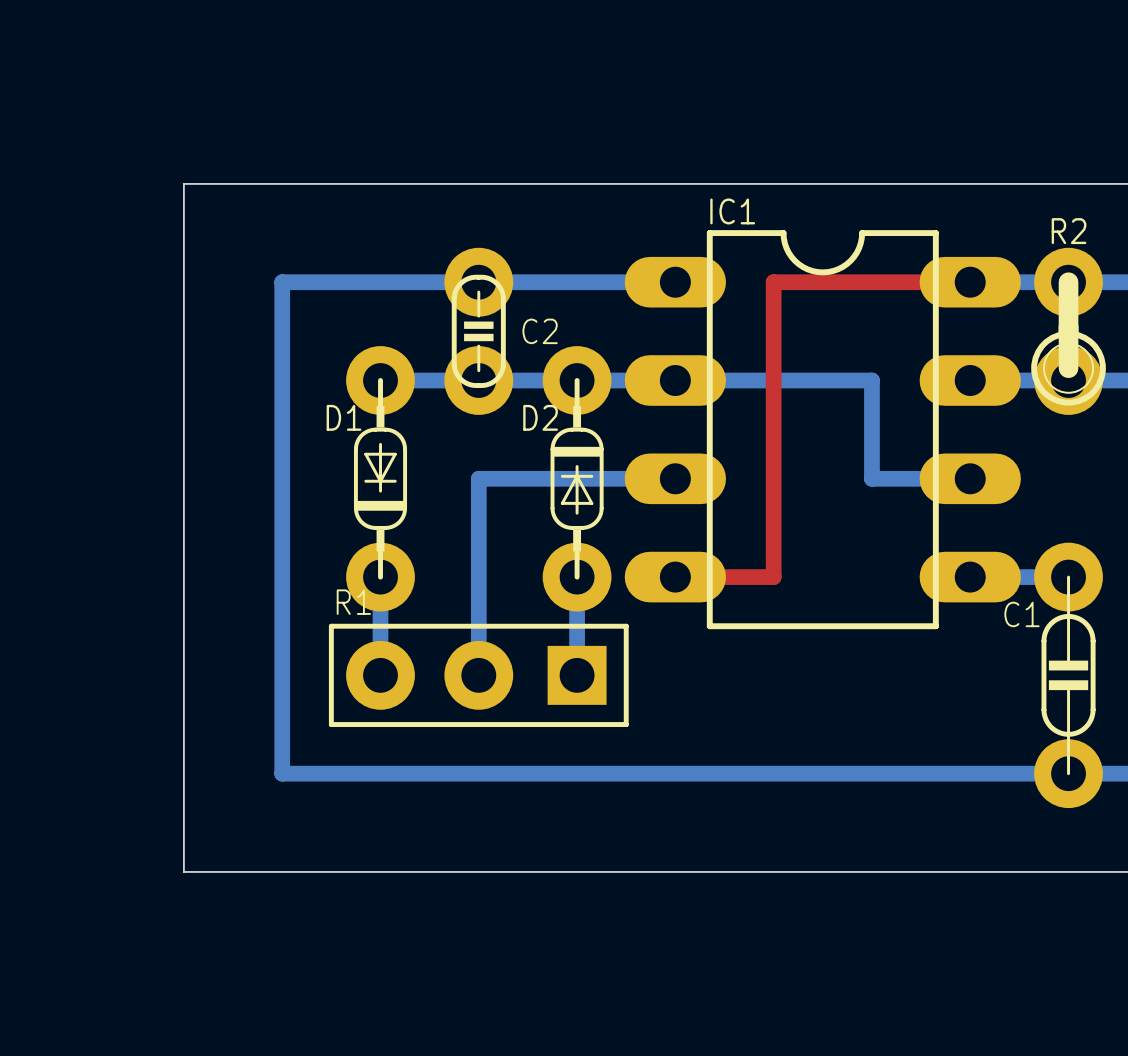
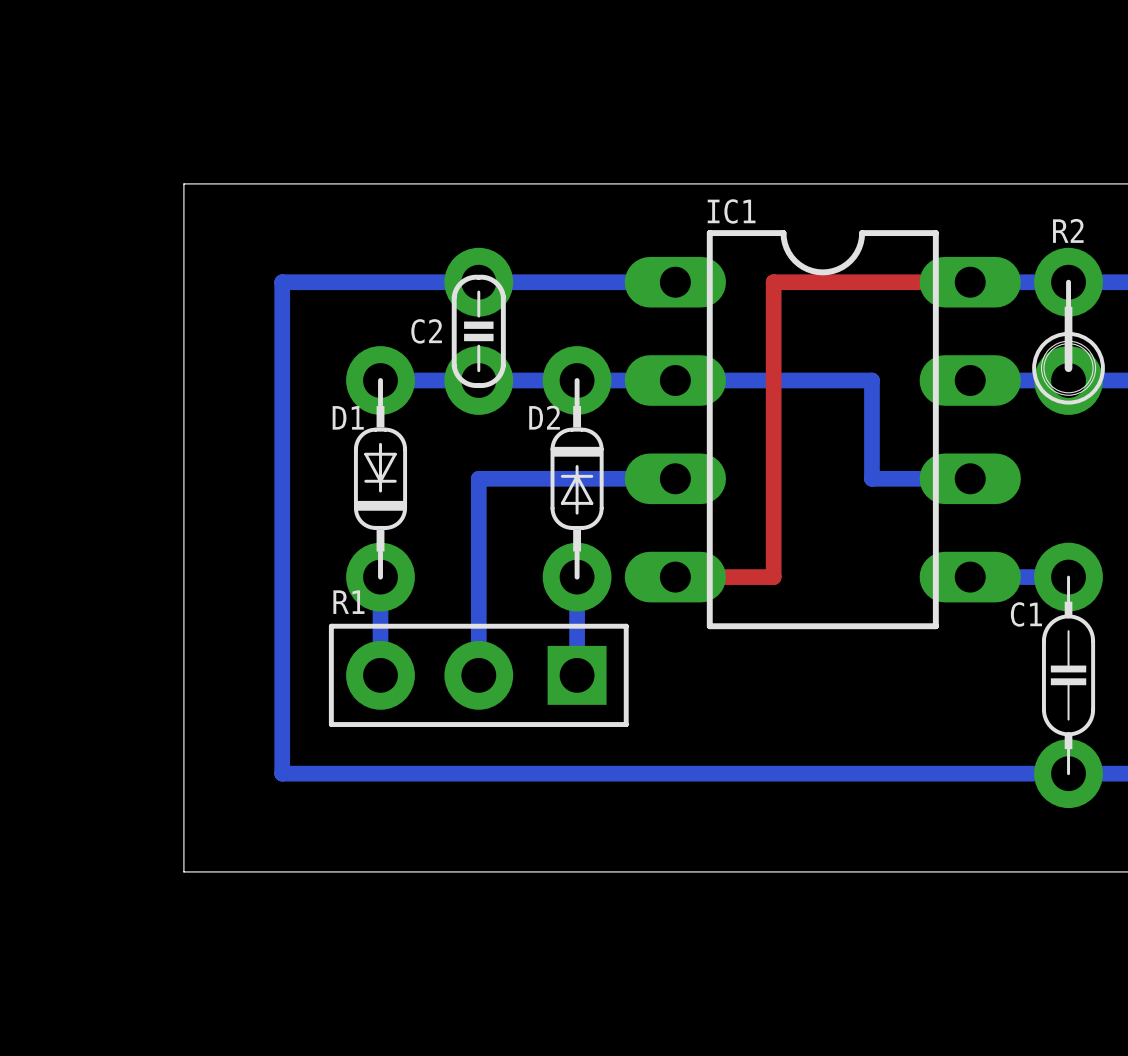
R2 footprint: [1031, 247, 1106, 415] -> [1032, 247, 1105, 415]
C2 name position: C2 (540, 331) -> C2 (426, 331)
C1 footprint: [1034, 542, 1103, 809] -> [1034, 542, 1103, 809]

